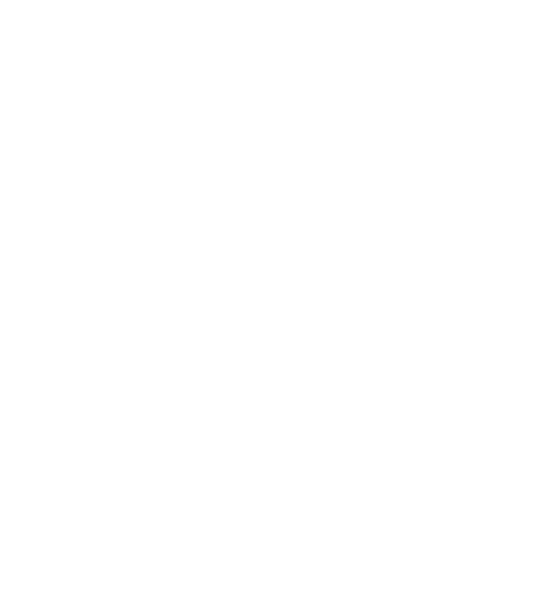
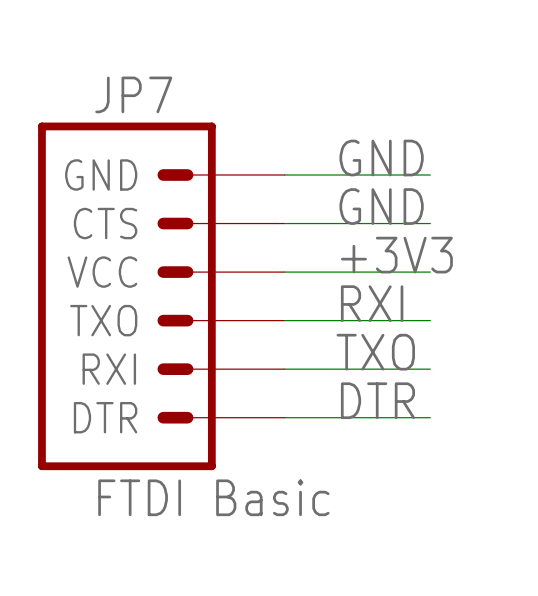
label: none -> GND (381, 158)
wire: none -> (284, 175) (430, 175)
label: none -> GND (381, 206)
wire: none -> (284, 223) (430, 223)
label: none -> +3V3 (396, 255)
wire: none -> (284, 272) (430, 272)
JP7: none -> FTDI Basic (161, 296)
label: none -> RXI (372, 303)
wire: none -> (284, 320) (430, 320)
label: none -> TXO (375, 352)
wire: none -> (284, 369) (430, 369)
label: none -> DTR (377, 400)
wire: none -> (284, 417) (430, 417)

